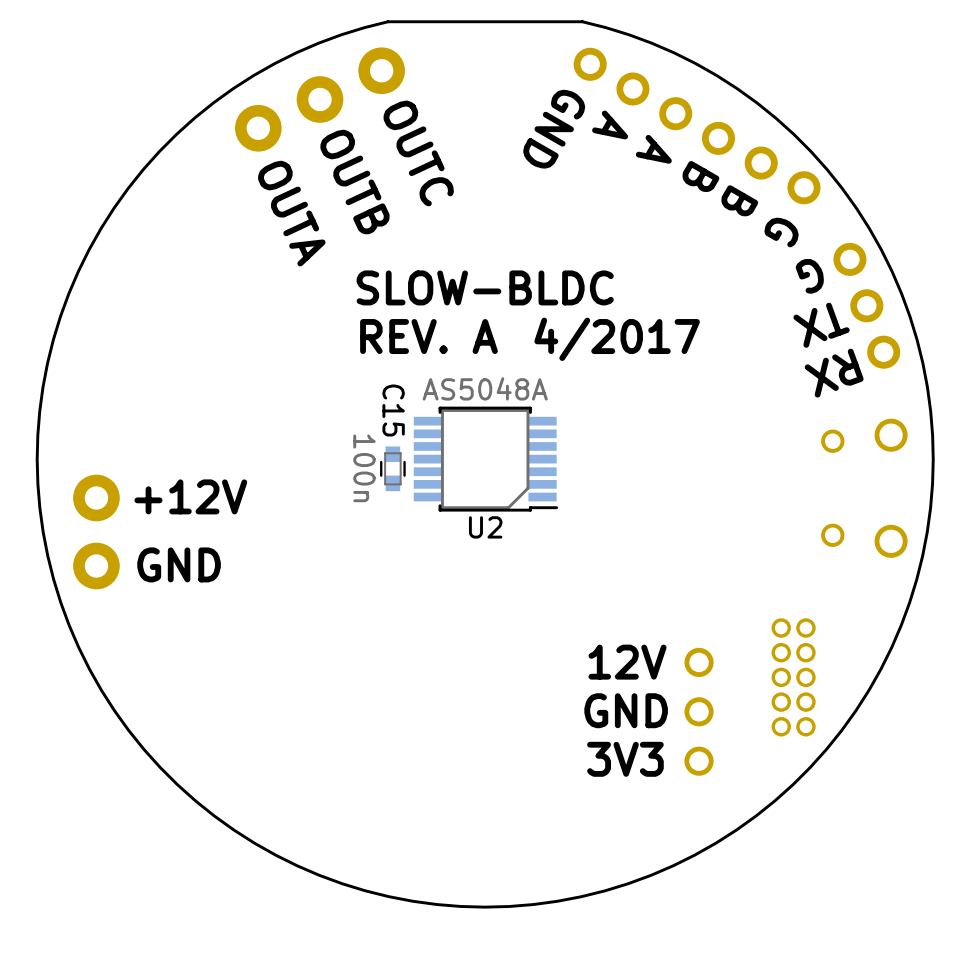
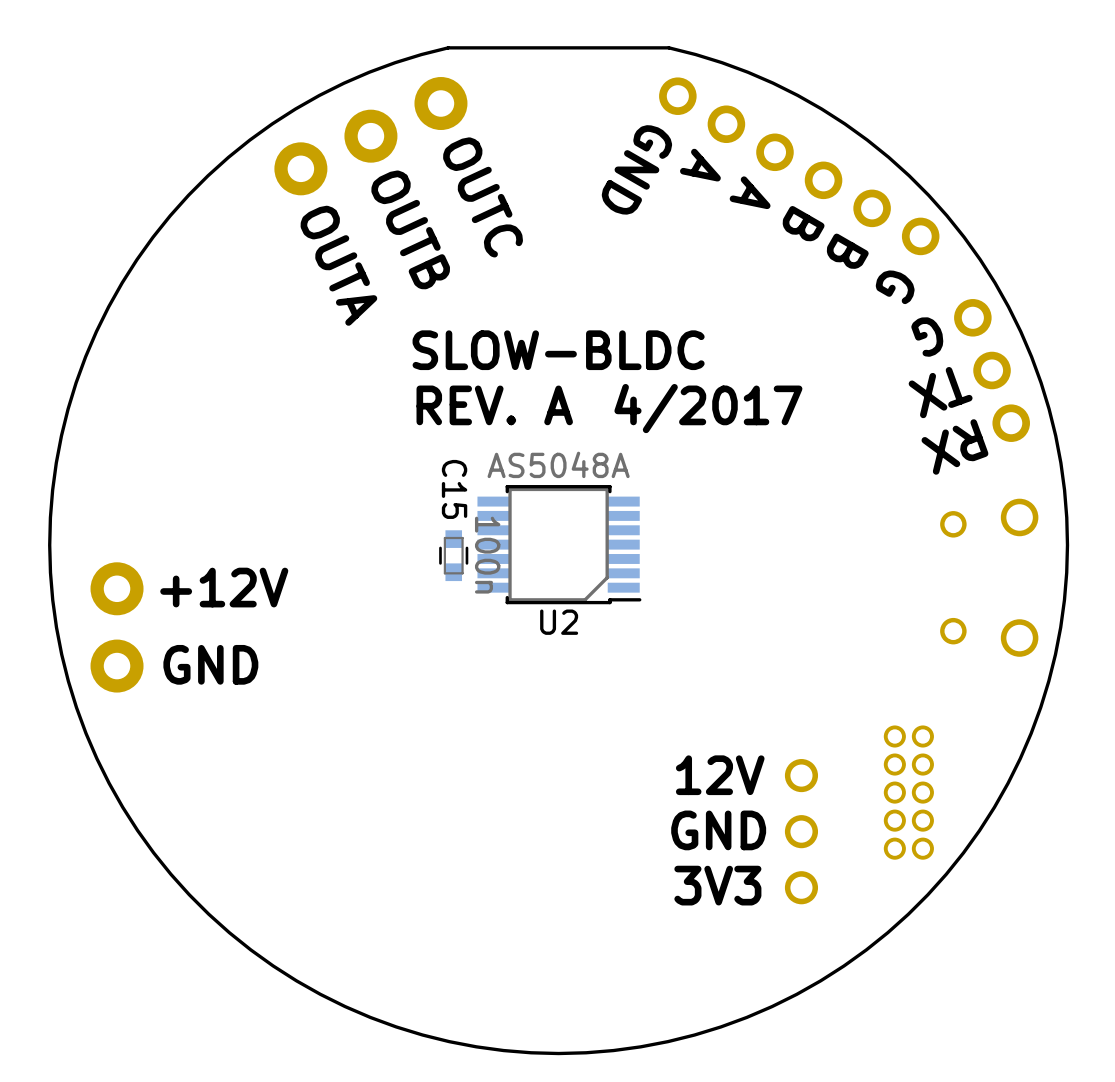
C15 value position: 100n (364, 468) -> 100n (487, 555)

